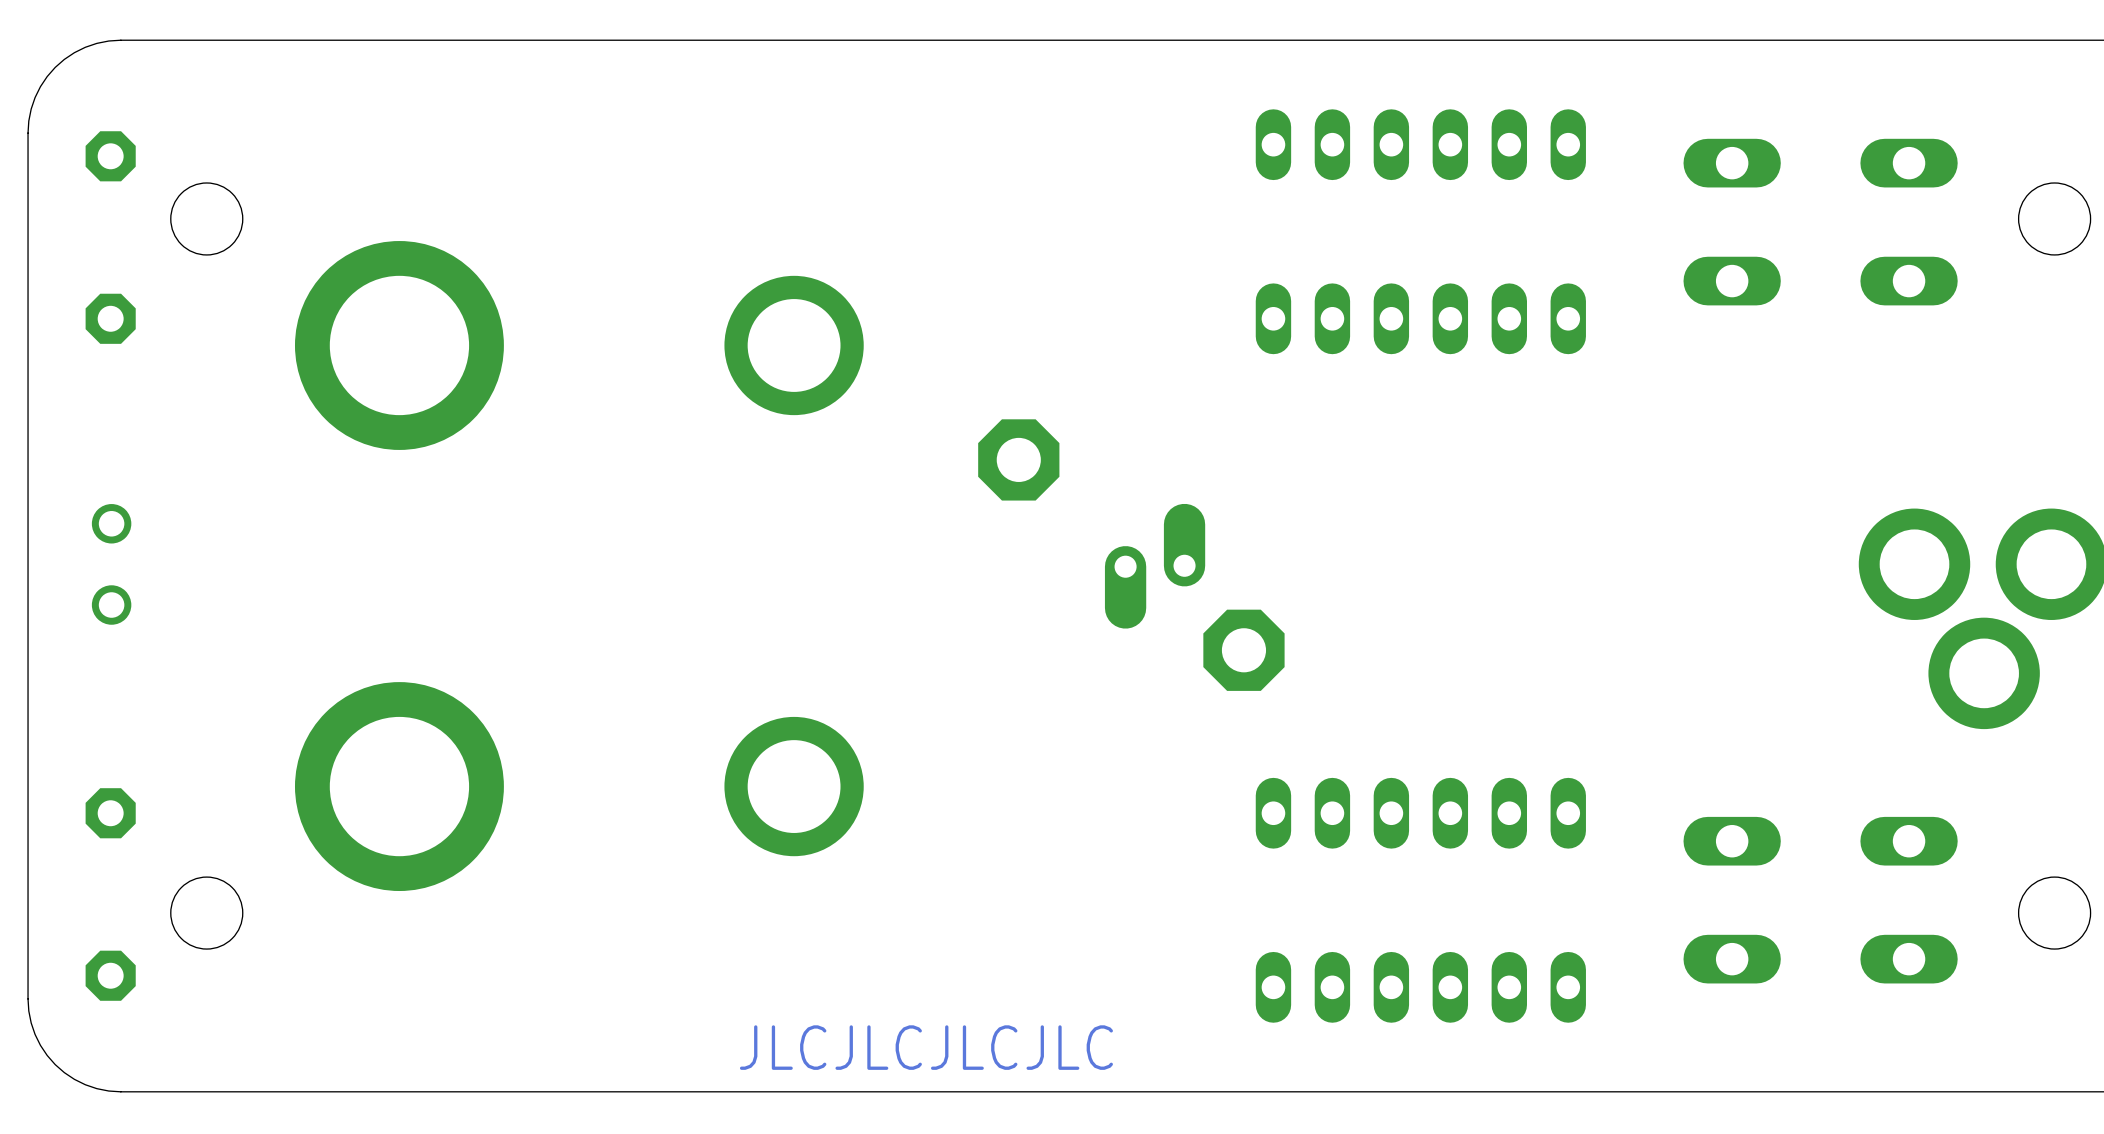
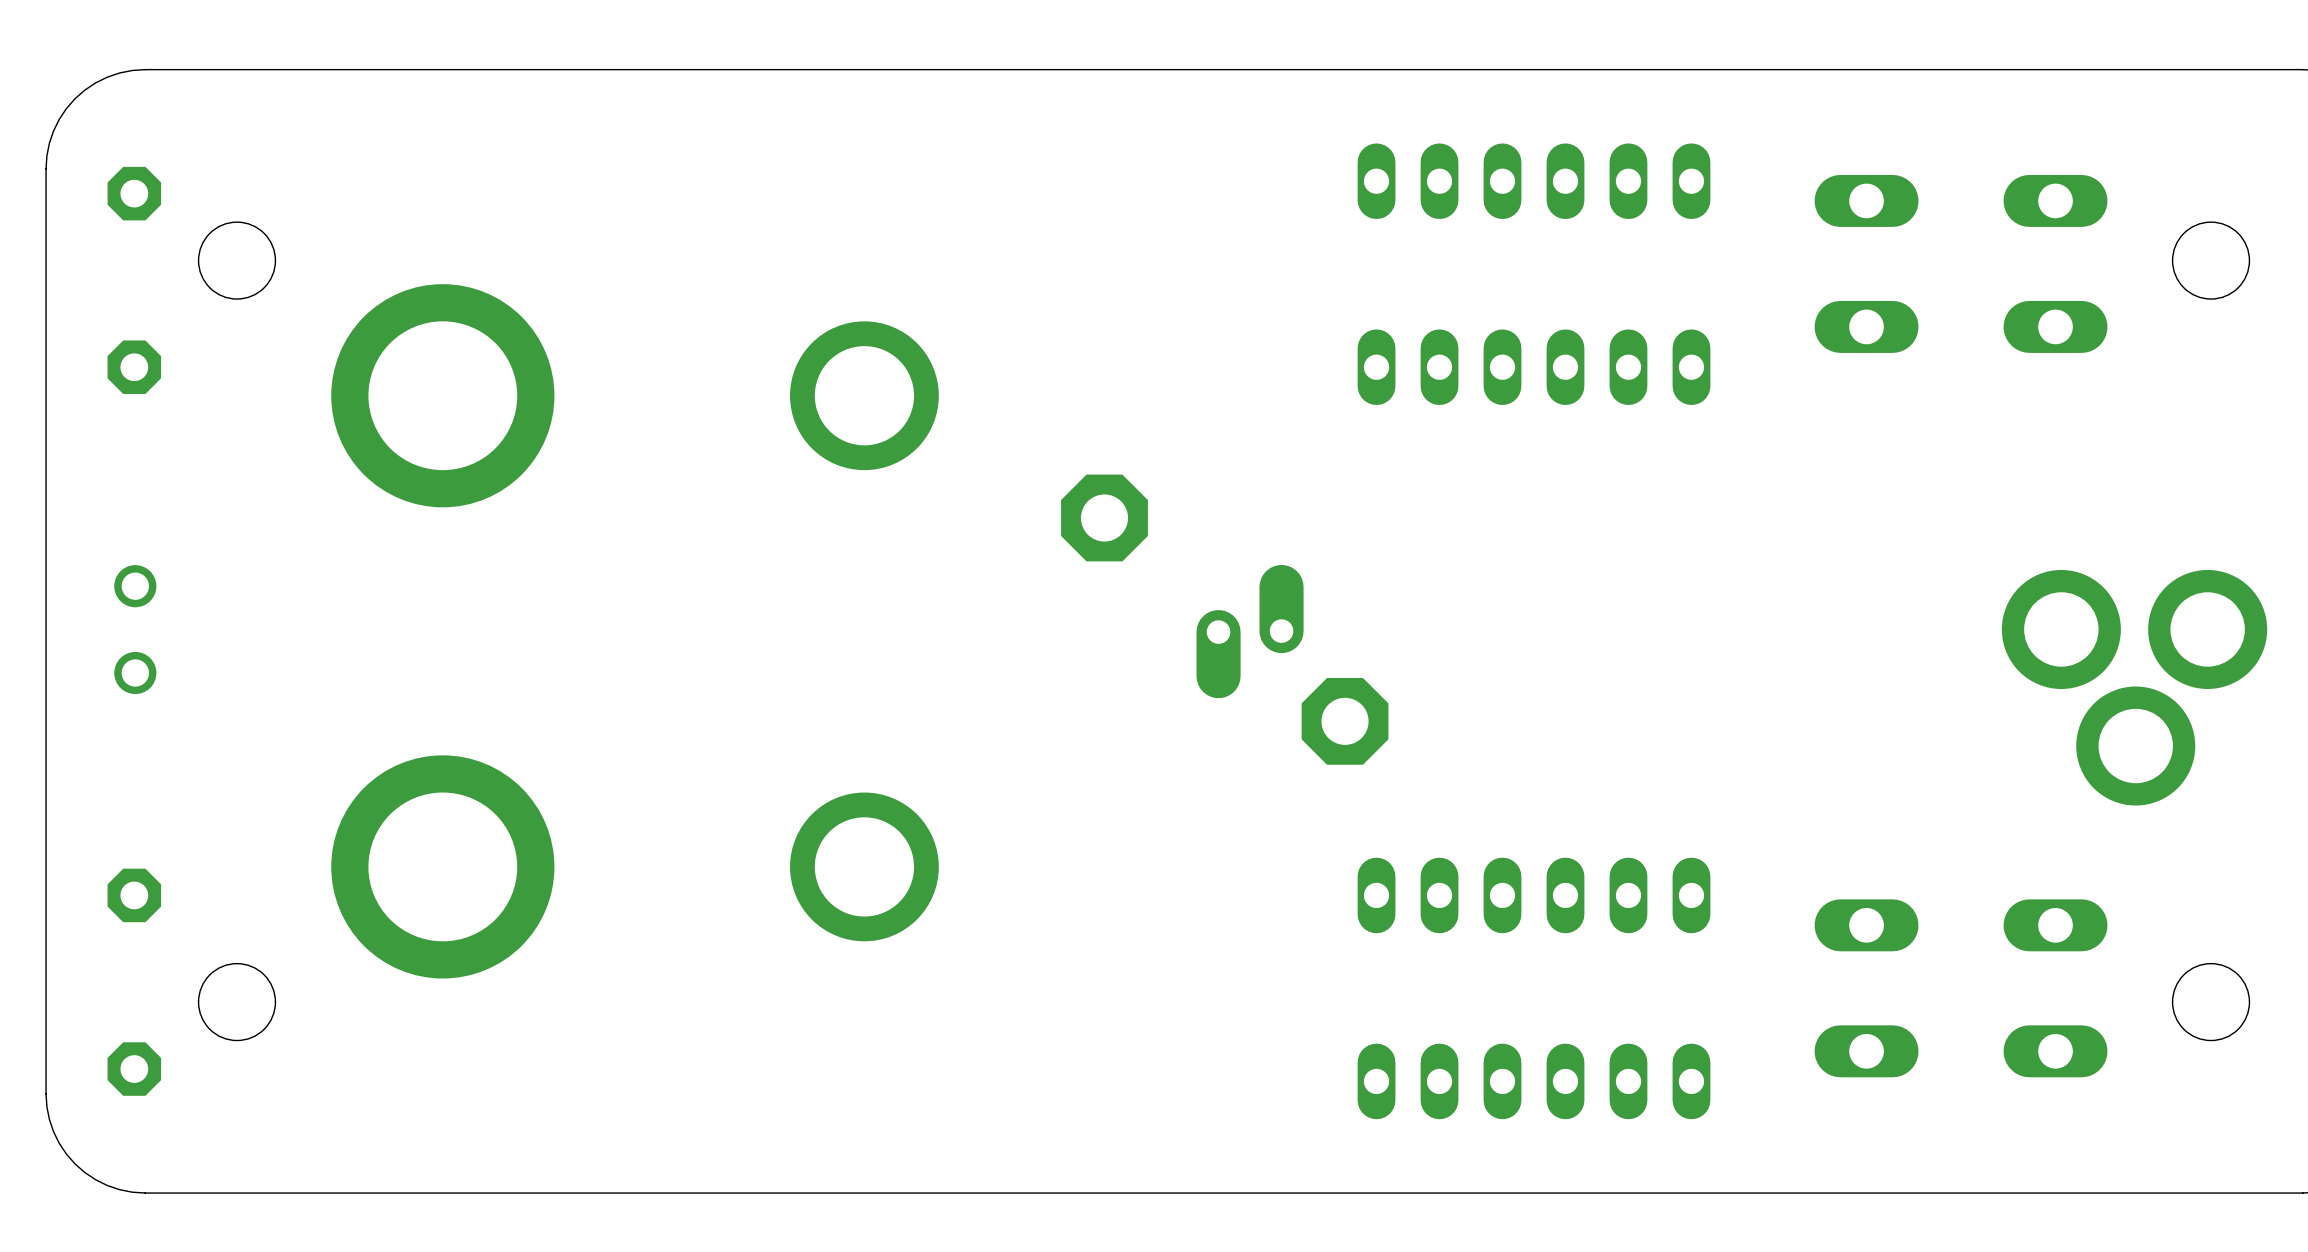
text: JLCJLCJLCJLC (926, 1047) -> none

